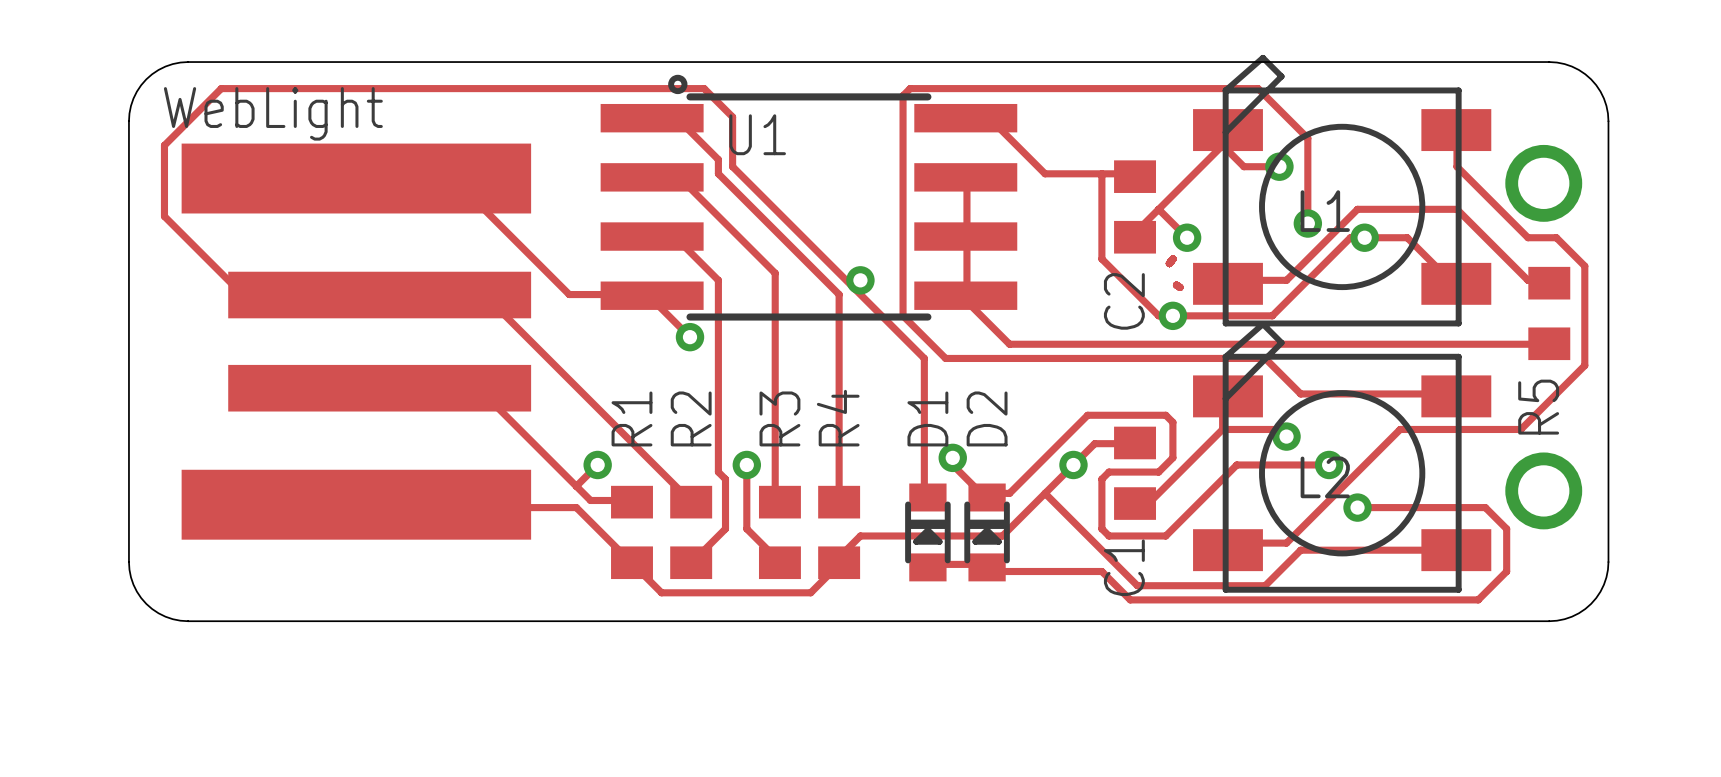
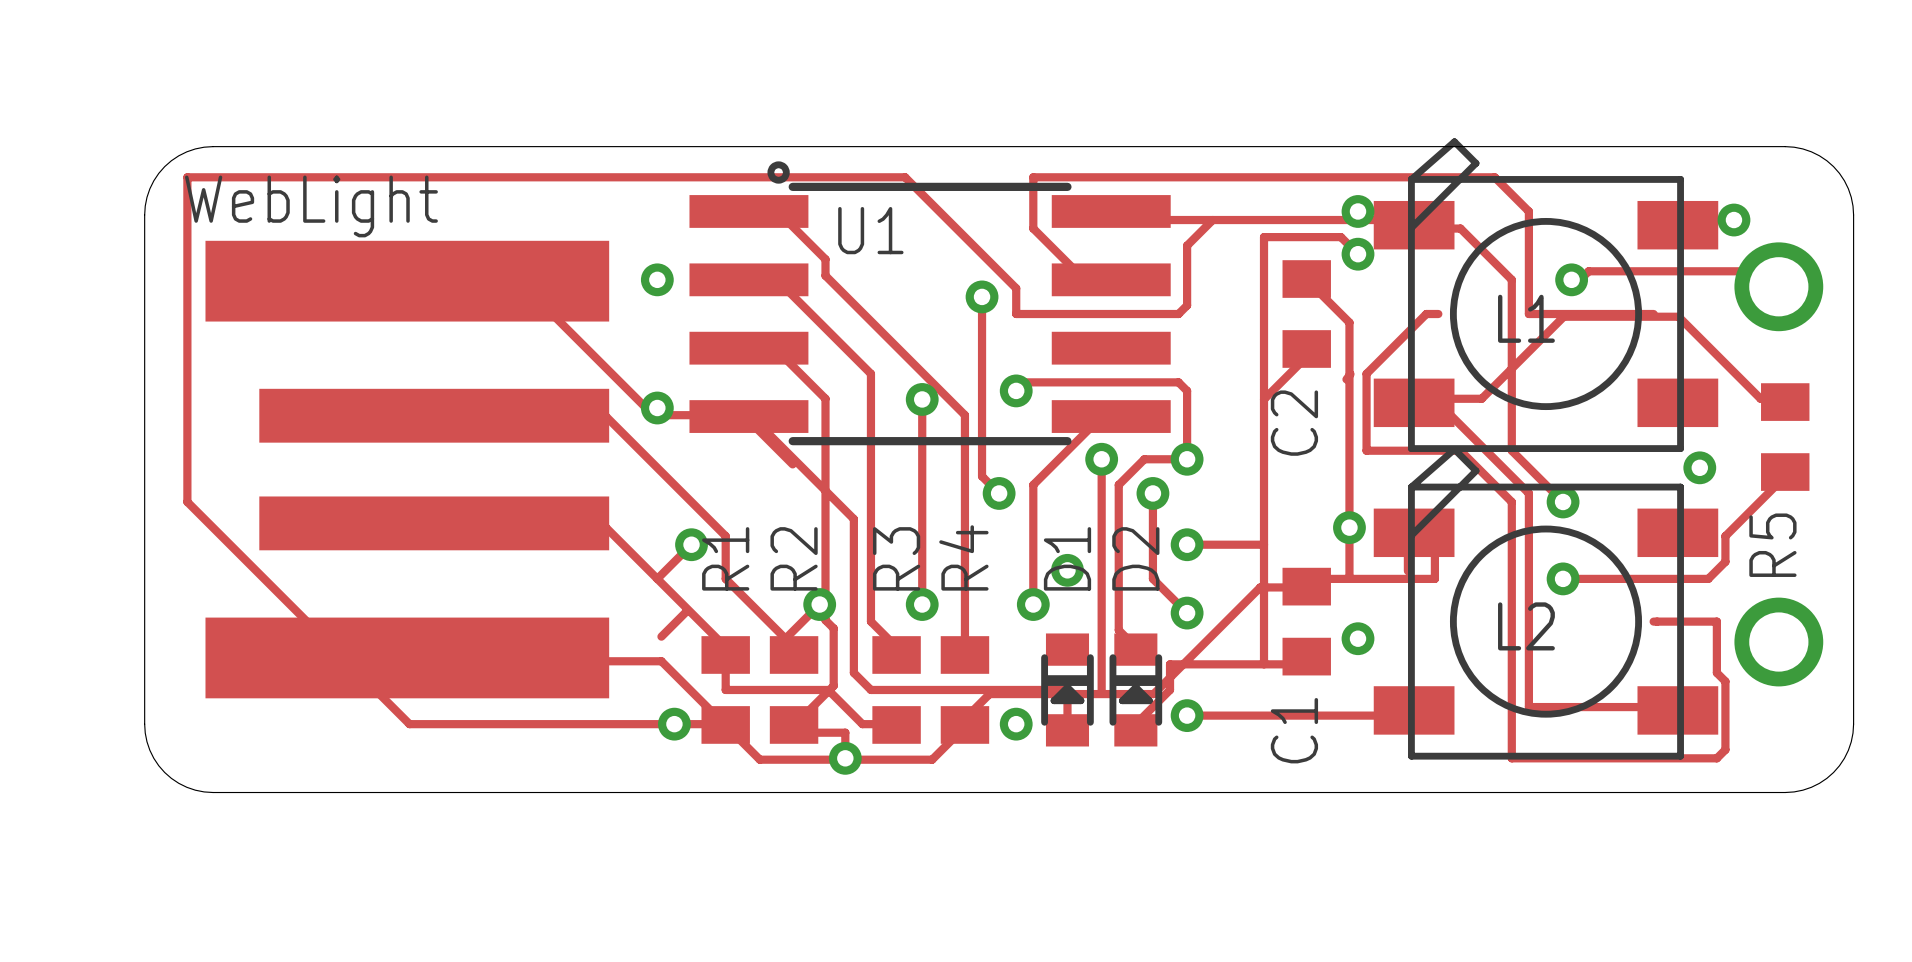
track: (221, 88) (164, 145) (164, 216) (242, 294) (377, 294) (384, 301) (491, 301) (691, 502) -> (251, 177) (187, 177) (187, 501) (409, 724) (725, 724)
track: (704, 88) (732, 117) (732, 166) (924, 358) (924, 493) (927, 497) -> (809, 177) (905, 177) (1016, 288) (1016, 314) (1178, 314) (1187, 305) (1187, 245) (1212, 220)
track: (910, 88) (903, 95) (903, 315) (945, 358) (1265, 358) (1300, 393) (1449, 393) (1456, 396) -> (1046, 177) (1033, 177) (1033, 228) (1084, 279) (1111, 279)
track: (1258, 88) (1307, 138) (1307, 223) -> (1448, 177) (1494, 177) (1528, 211) (1528, 314) (1653, 314)
track: (965, 118) (966, 124) (995, 124) (1045, 173) (1130, 173) (1135, 176) -> (1111, 211) (1118, 211) (1118, 220) (1434, 220) (1443, 228) (1460, 228) (1511, 279) (1511, 450) (1563, 501)
via: none -> (1358, 211)
via: none -> (1733, 220)
track: (1456, 130) (1456, 166) (1527, 237) (1556, 237) (1584, 266) (1584, 365) (1520, 429) (1400, 429) (1286, 543) (1229, 543) (1227, 550) -> none
track: (1222, 145) (1137, 230) (1135, 237) -> (1264, 399) (1306, 356) (1306, 348)
track: (1222, 145) (1243, 166) (1279, 166) -> none
track: none -> (1358, 254) (1340, 237) (1264, 237) (1264, 664)
via: none -> (1358, 254)
via: (1279, 166) -> none
track: (1101, 173) (1101, 259) (1158, 315) (1272, 315) (1350, 237) (1407, 237) (1449, 280) (1456, 283) -> none
via: none -> (657, 279)
track: (652, 177) (654, 180) (682, 180) (775, 273) (775, 500) (779, 502) -> (748, 279) (776, 279) (870, 373) (870, 621) (896, 647) (896, 654)
track: (965, 177) (966, 301) (1009, 344) (1549, 344) -> (1563, 578) (1708, 578) (1725, 561) (1725, 536) (1785, 476) (1785, 472)
track: none -> (1306, 279) (1349, 322) (1349, 578)
track: none -> (1571, 279) (1580, 279) (1588, 271) (1776, 271) (1778, 286)
via: none -> (1571, 279)
track: none -> (982, 296) (982, 476) (999, 493)
via: none -> (982, 296)
track: none -> (1438, 314) (1426, 314) (1366, 373) (1366, 450) (1460, 450) (1511, 501) (1511, 758) (1716, 758) (1725, 749) (1725, 681) (1716, 672) (1716, 621) (1653, 621)
track: (1158, 209) (1187, 237) -> none
via: (1307, 223) -> none
via: (1187, 237) -> none
via: (1364, 237) -> none
track: none -> (1016, 390) (1016, 382) (1178, 382) (1187, 390) (1187, 459) (1144, 459) (1118, 484) (1118, 630) (1135, 647) (1135, 649)
track: none -> (922, 399) (922, 604)
via: none -> (922, 399)
via position: (860, 280) -> (1016, 390)
track: (1176, 285) (1180, 287) -> none
track: none -> (1438, 405) (1443, 408) (1528, 493) (1528, 707) (1648, 707) (1653, 713)
via: none -> (657, 408)
track: none -> (434, 415) (606, 416) (725, 536) (725, 578) (794, 647) (794, 654) (785, 638) (819, 604)
track: none -> (1111, 416) (1101, 416) (1033, 484) (1033, 604)
via: (1172, 315) -> none
track: none -> (1101, 459) (1101, 689)
via: none -> (1101, 459)
via: none -> (1187, 459)
via: (689, 337) -> none
via: none -> (1699, 467)
via: none -> (999, 493)
track: none -> (1152, 493) (1152, 578) (1187, 613)
via: none -> (1152, 493)
via: none -> (1563, 501)
track: (379, 388) (384, 393) (484, 393) (590, 500) (632, 502) -> (434, 523) (435, 527) (606, 527) (725, 647) (725, 689) (828, 689) (862, 724) (896, 724)
via: none -> (1349, 527)
track: none -> (1438, 530) (1434, 536) (1434, 578) (1306, 578) (1306, 586)
track: none -> (691, 544) (657, 578)
via: none -> (691, 544)
track: none -> (1187, 544) (1264, 544)
via: none -> (1187, 544)
via: none -> (1067, 570)
track: (1286, 436) (1279, 429) (1222, 429) (1151, 500) (1137, 500) (1135, 503) -> (1135, 724) (1170, 689) (1170, 664) (1306, 664) (1306, 656)
via: (1286, 436) -> none
via: none -> (1563, 578)
track: (952, 457) (952, 464) (987, 497) (988, 493) (1009, 493) (1087, 415) (1165, 415) (1172, 422) (1172, 457) (1158, 472) (1108, 472) (1101, 479) (1101, 528) (1108, 535) (1165, 535) (1236, 464) (1329, 464) -> none
via: (952, 457) -> none
via: none -> (819, 604)
via: none -> (922, 604)
via: none -> (1033, 604)
via: (597, 464) -> none
track: (746, 464) (746, 528) (779, 562) -> none
via: (746, 464) -> none
via: (1073, 464) -> none
via: (1329, 464) -> none
via: none -> (1187, 613)
via: none -> (1358, 638)
track: (1045, 493) (1137, 585) (1265, 585) (1300, 550) (1456, 550) -> none
track: (1357, 507) (1485, 507) (1506, 528) (1506, 571) (1478, 599) (1130, 599) (1101, 571) (988, 571) (987, 567) (981, 564) (931, 564) (927, 567) -> (748, 416) (751, 416) (853, 519) (853, 672) (870, 689) (1067, 689) (1067, 730)
via: (1357, 507) -> none
track: none -> (1438, 713) (1434, 715) (1187, 715)
via: none -> (1187, 715)
via: none -> (674, 724)
track: none -> (794, 724) (794, 732) (845, 732) (845, 758)
via: none -> (1016, 724)
via: none -> (845, 758)

